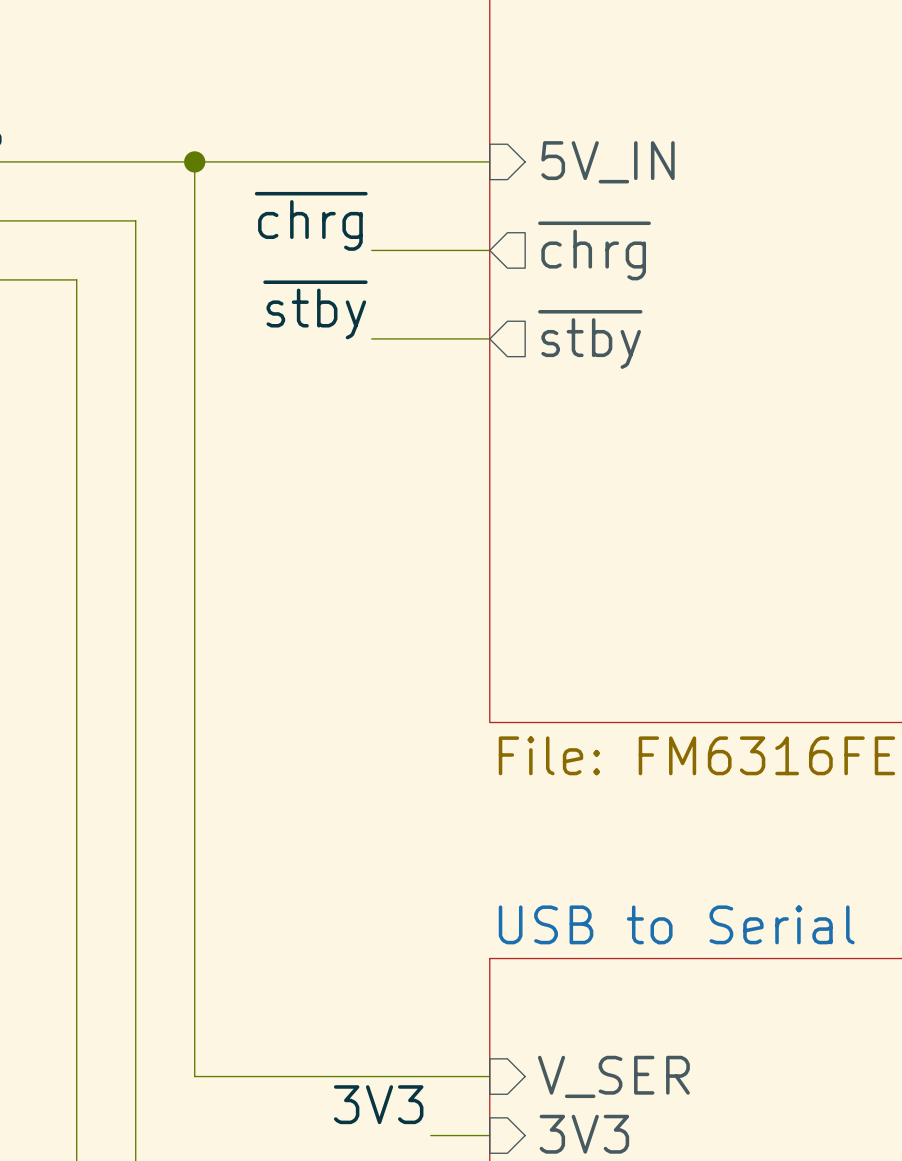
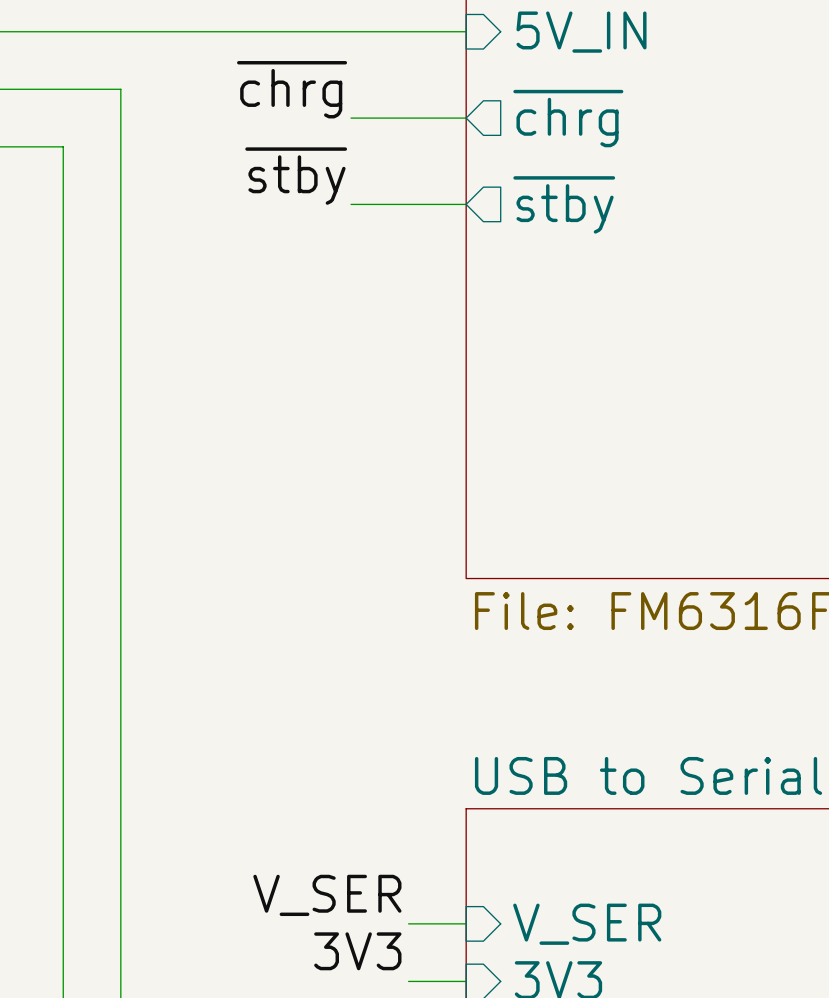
wire: (194, 161) (194, 1076) (430, 1076) -> none
junction: (194, 161) -> none
label: none -> V_SER (327, 895)

